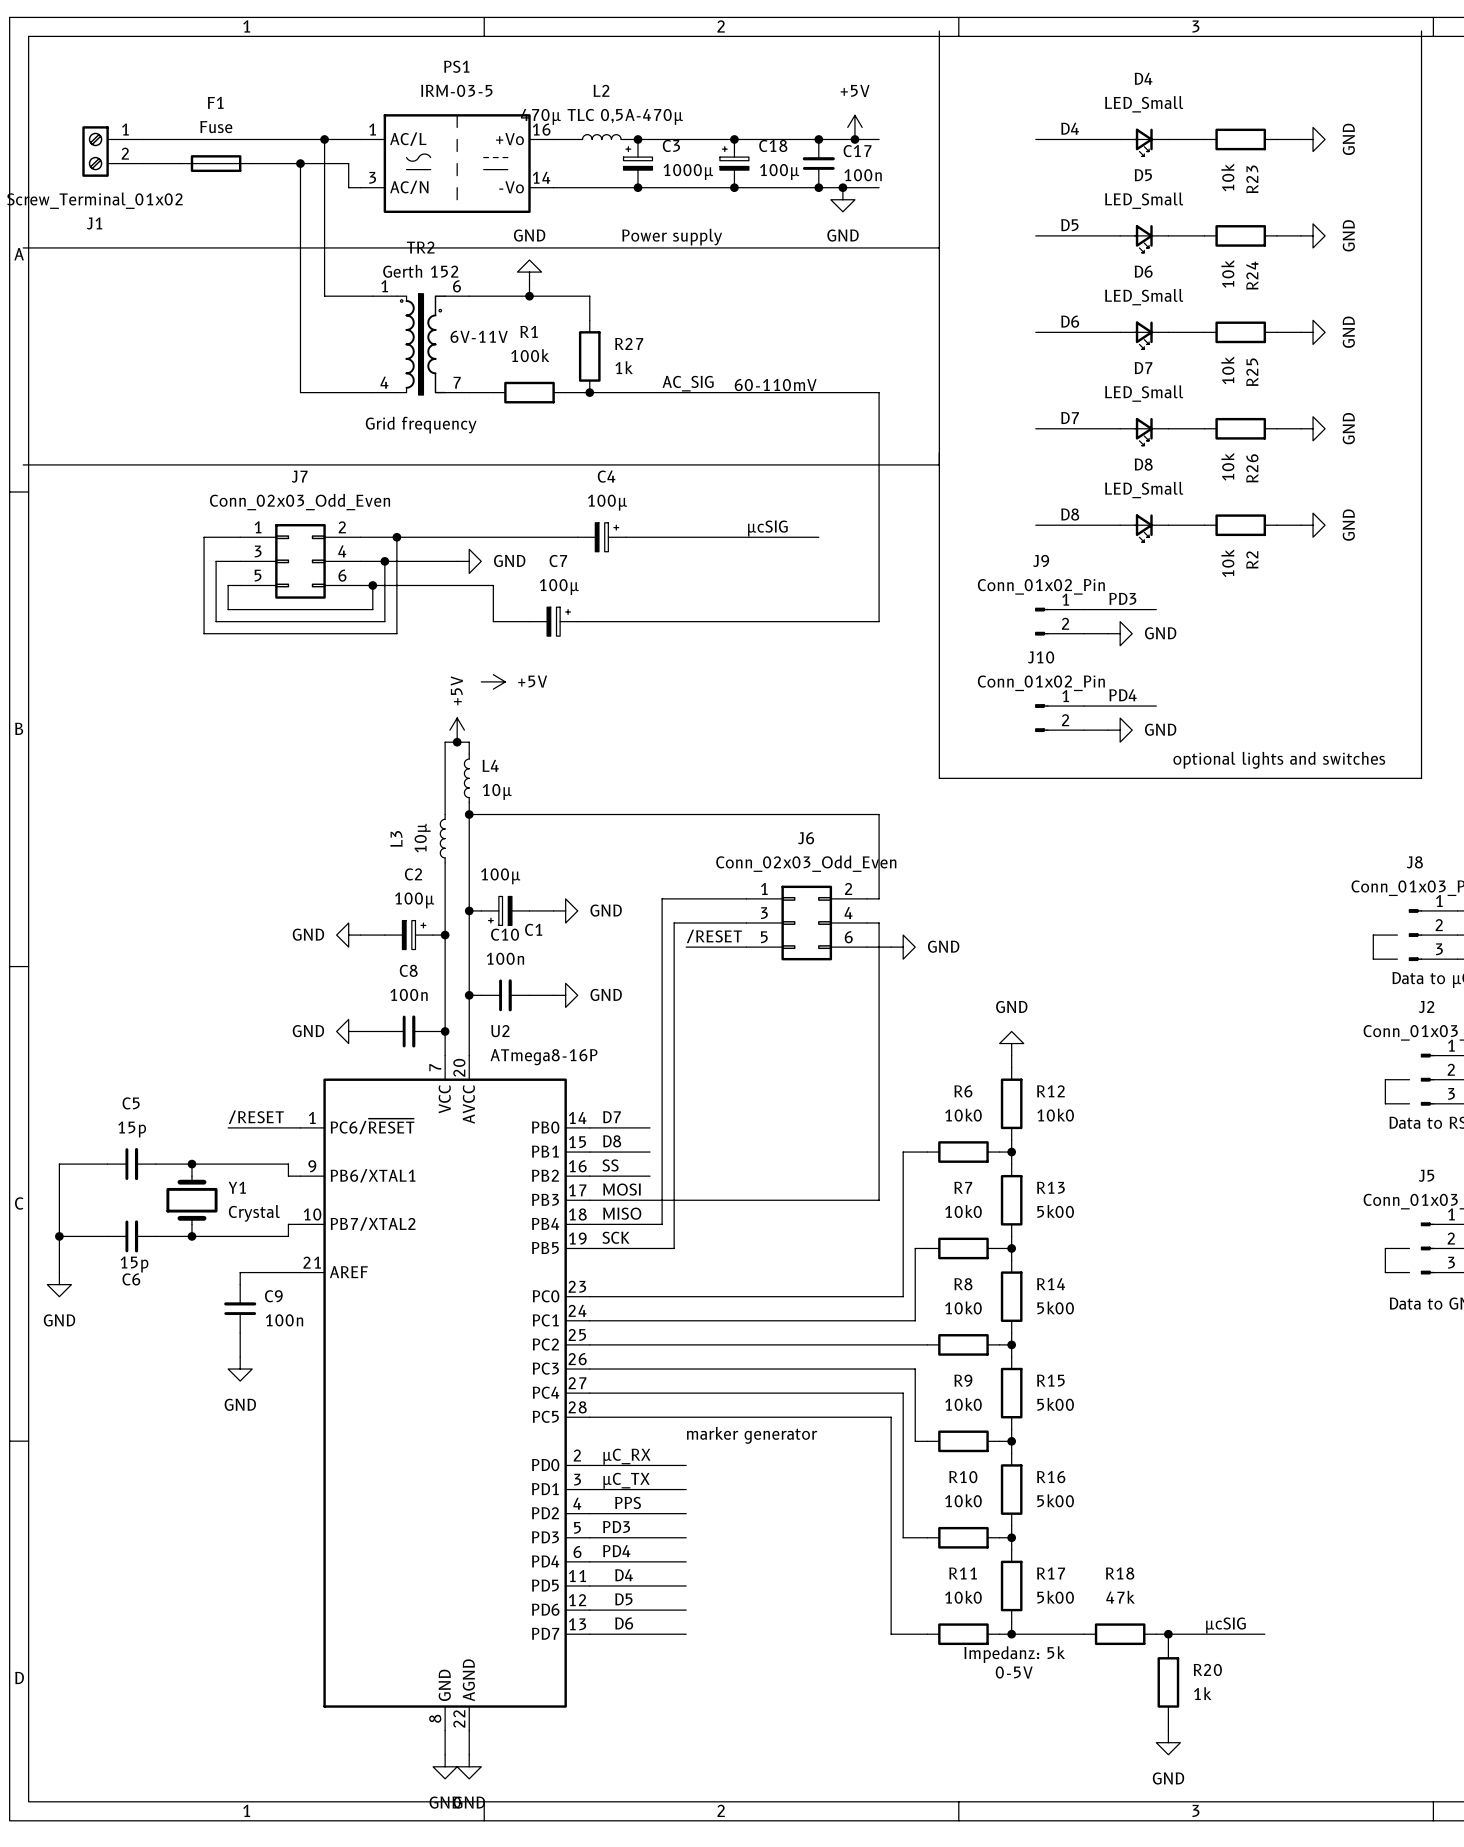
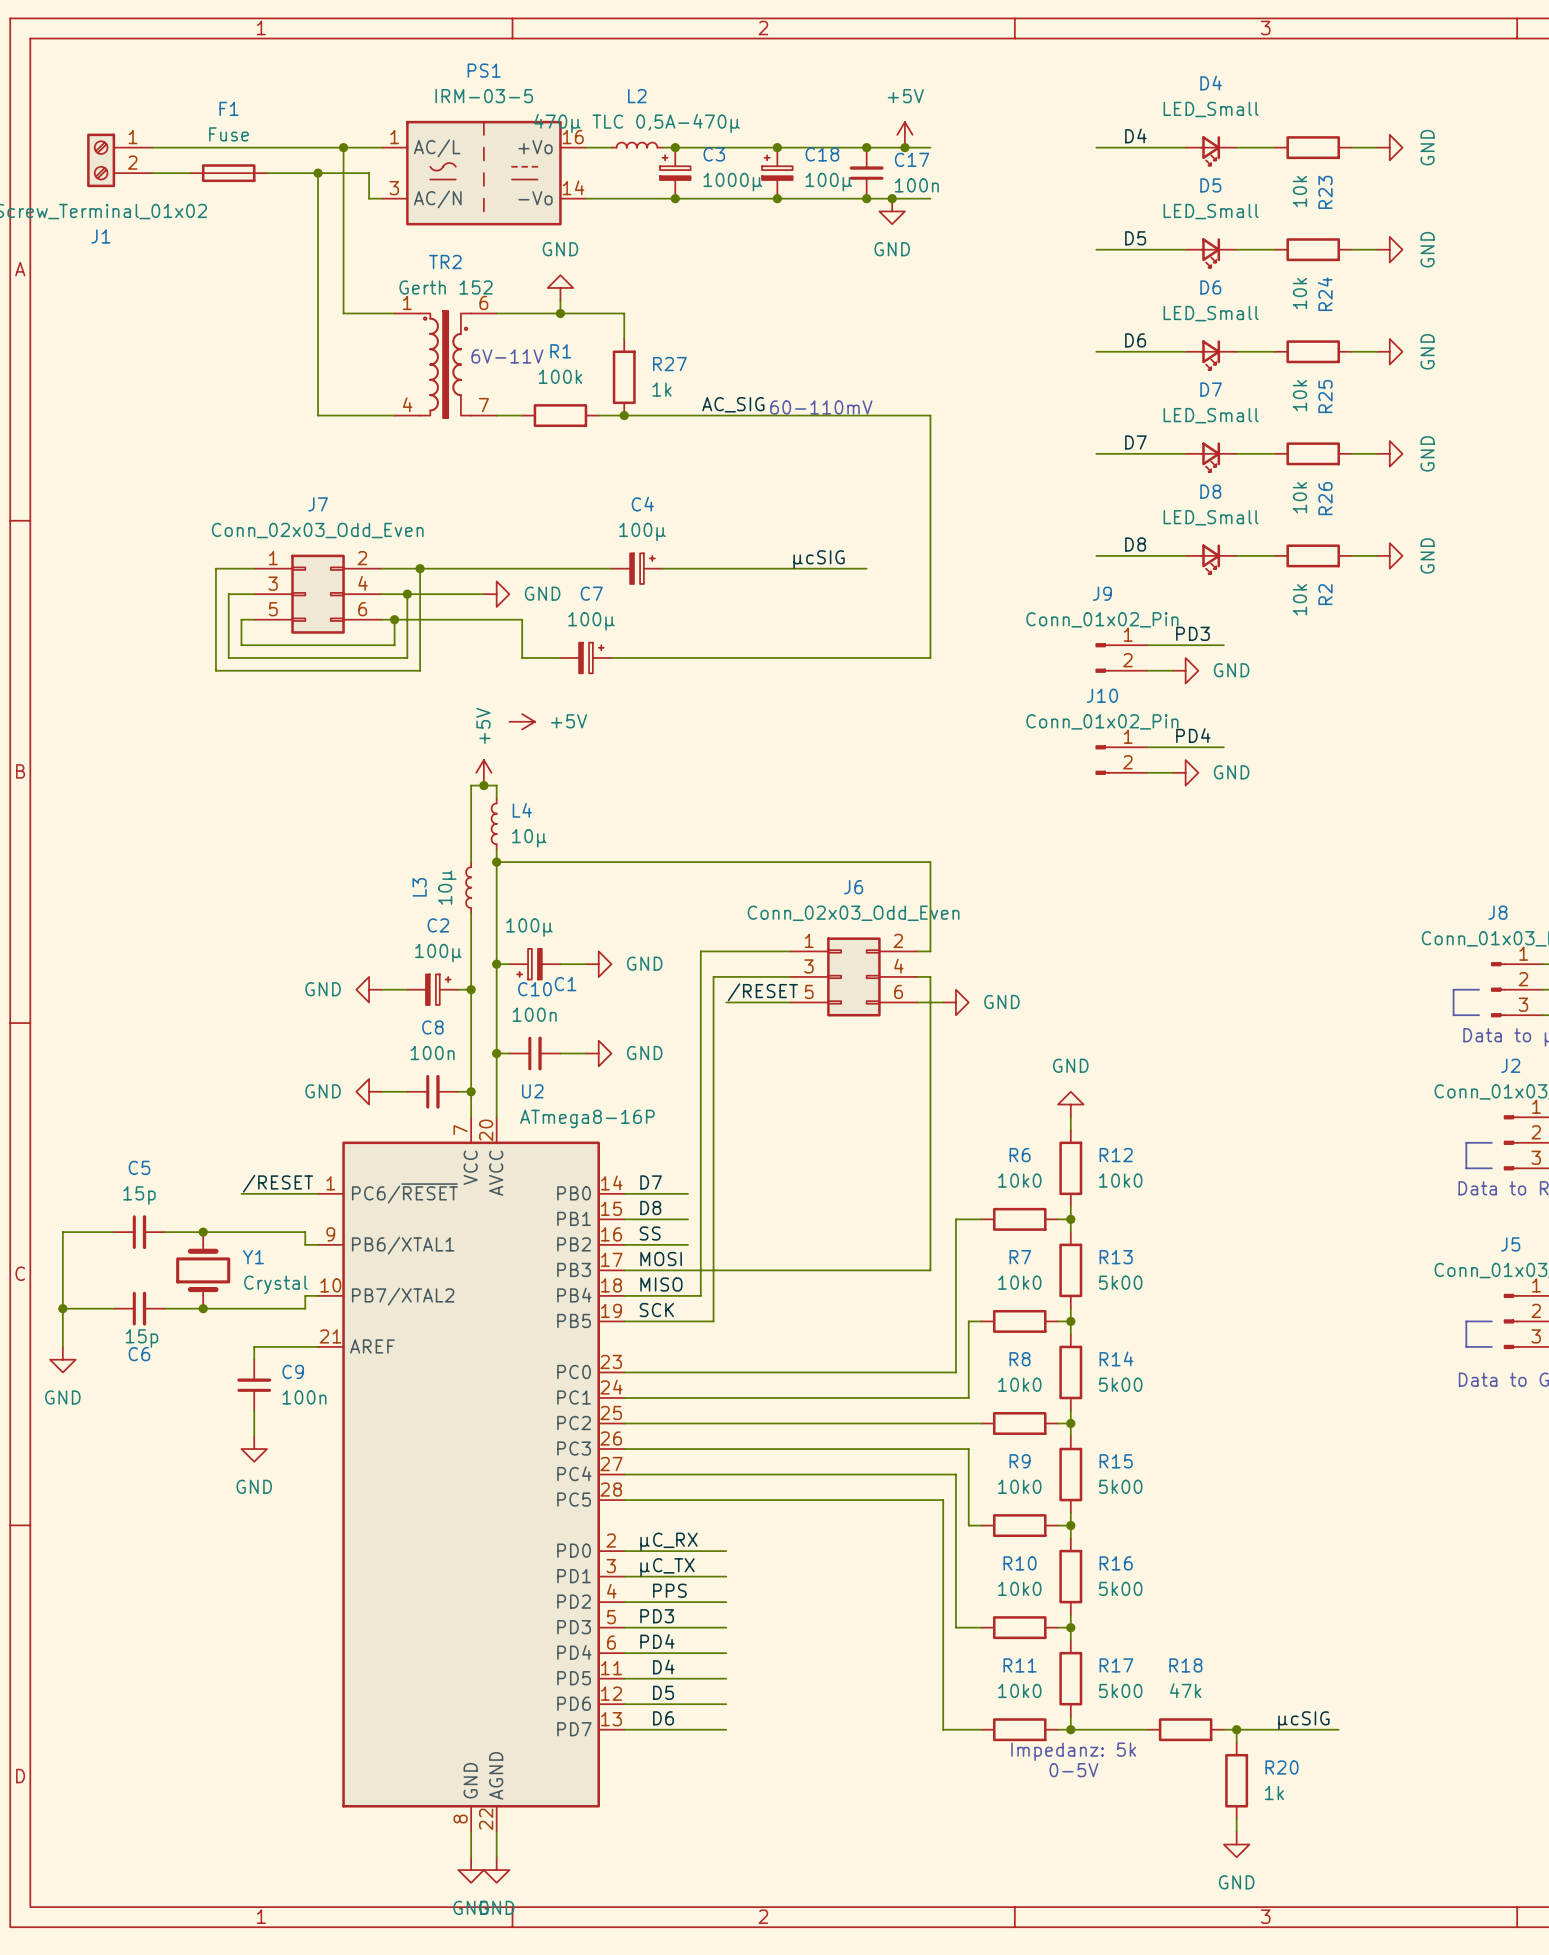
line: (939, 30) (939, 778) (1421, 778) (1421, 30) -> none
text: Power supply (672, 237) -> none
line: (23, 247) (939, 247) -> none
text: Grid frequency (421, 425) -> none
line: (23, 464) (939, 464) -> none
text: optional lights and switches (1279, 760) -> none
text: marker generator (752, 1435) -> none

